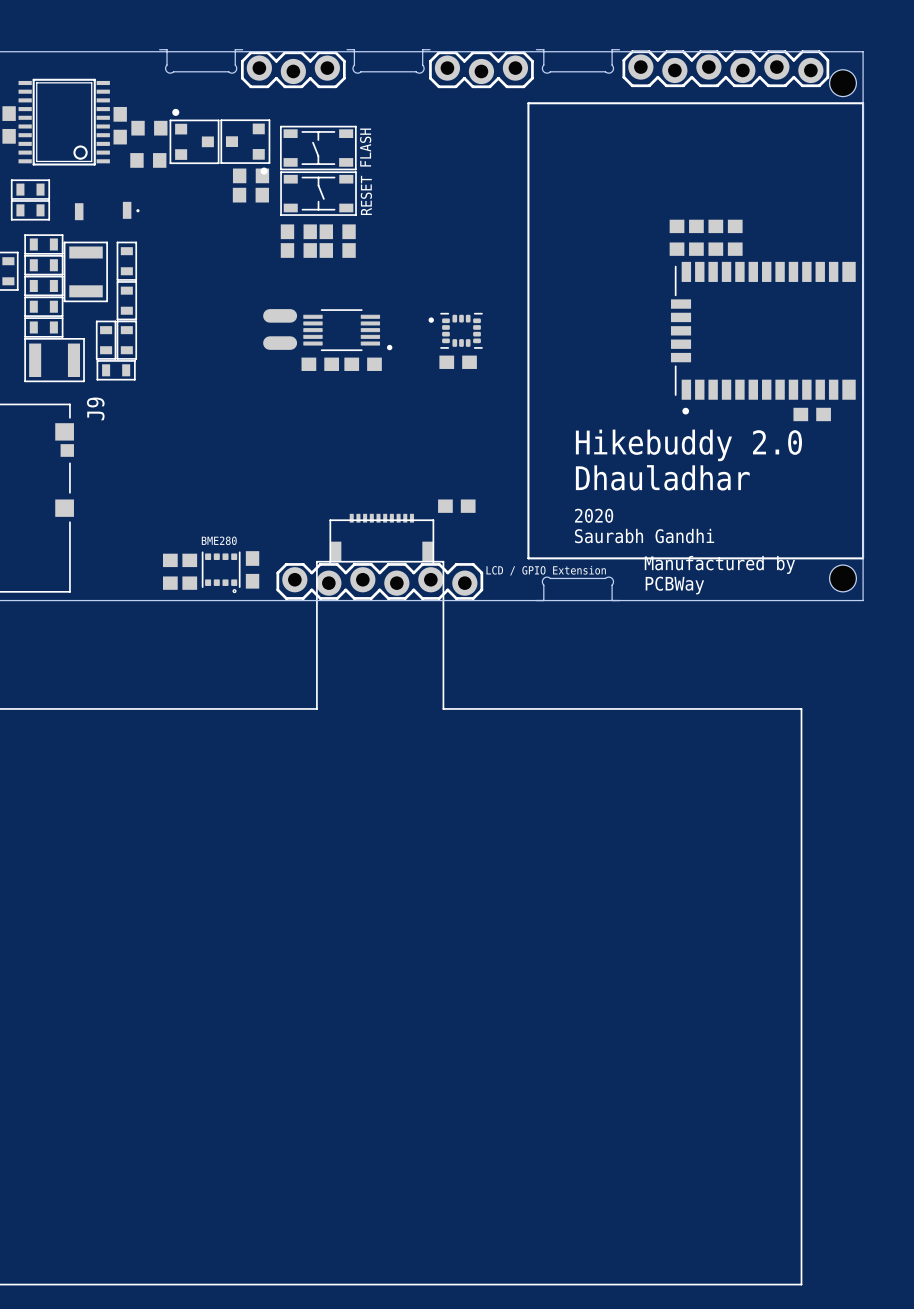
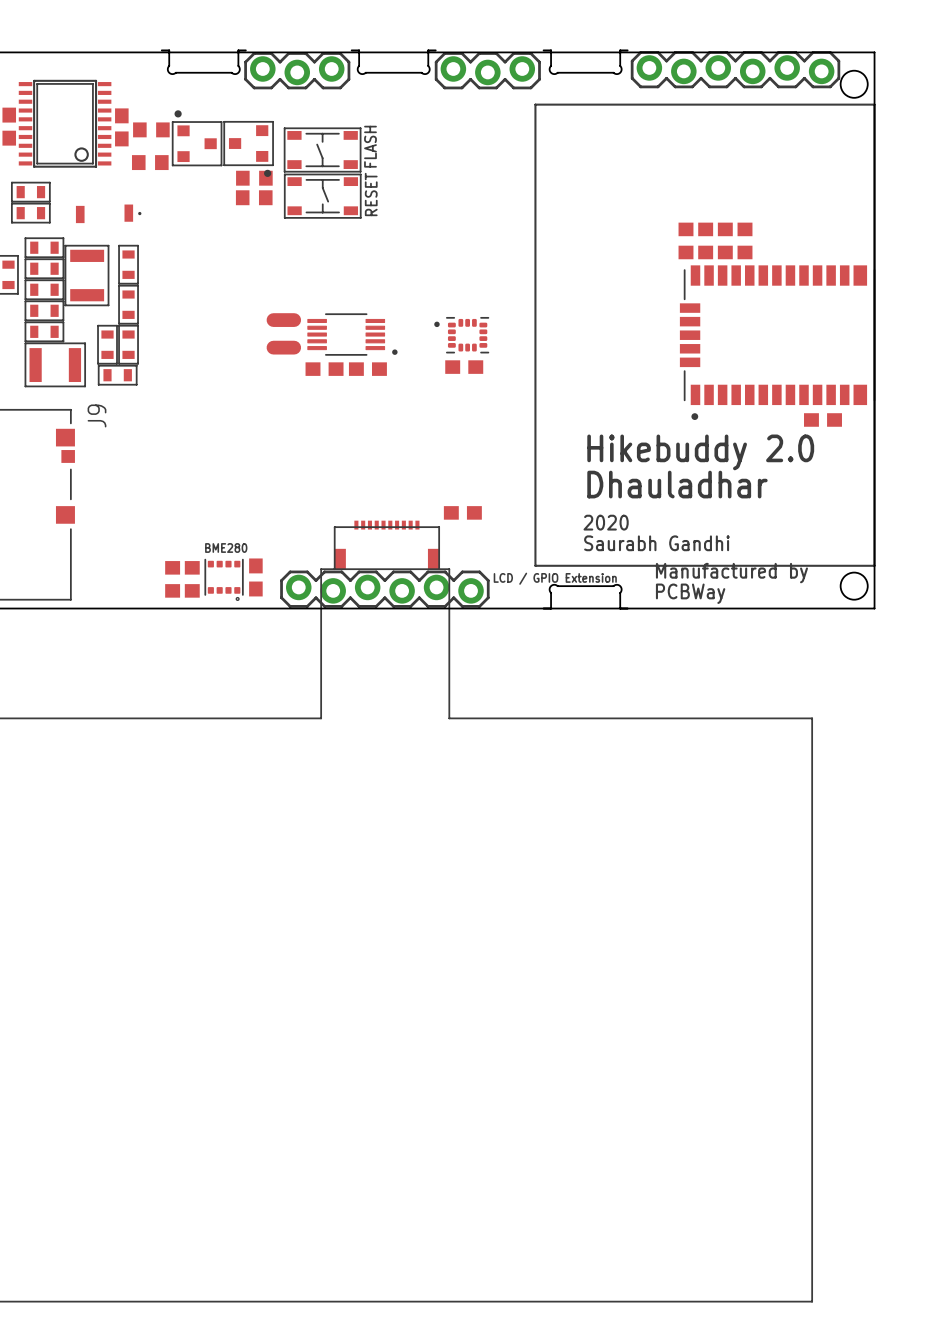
part: (298, 231) -> none
part: (337, 231) -> none
part: (298, 250) -> none
part: (337, 250) -> none

